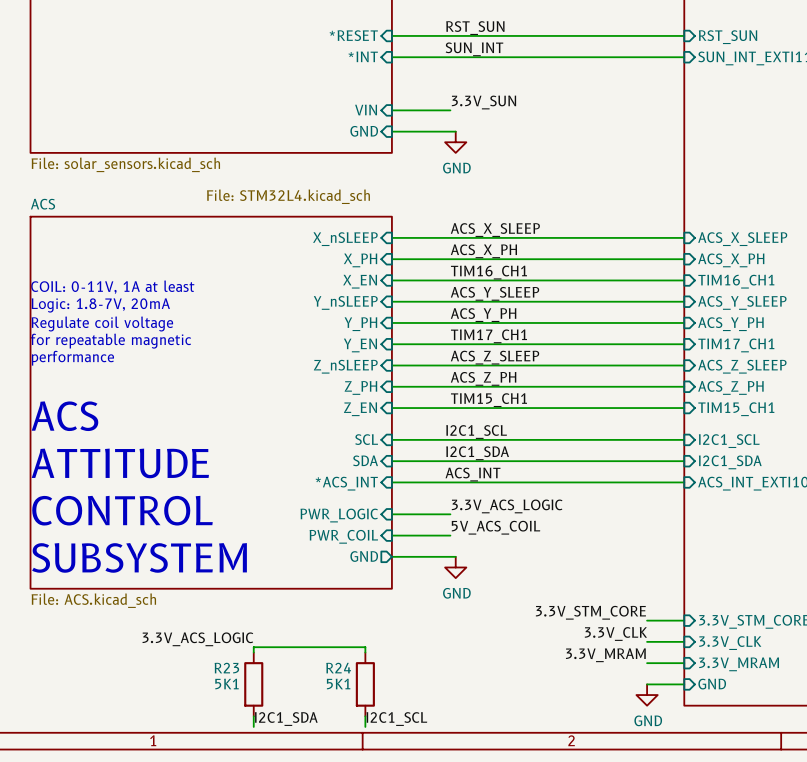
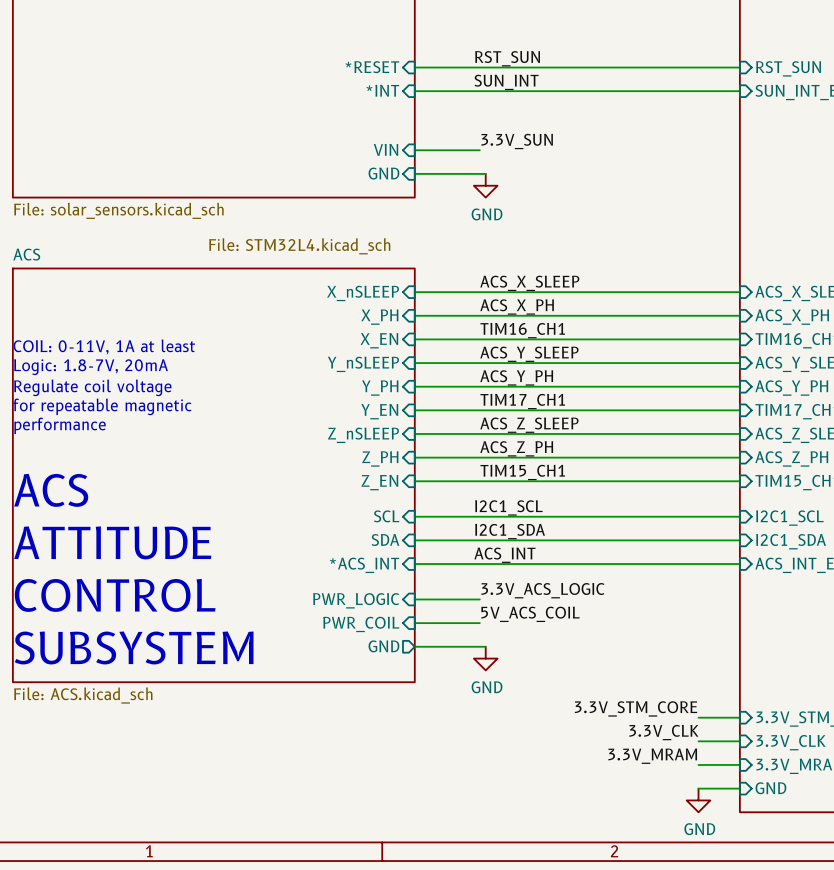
label: 3.3V_ACS_LOGIC (197, 639) -> none
wire: (253, 652) (253, 647) (365, 647) (365, 652) -> none
R23: 5K1 (253, 684) -> none
R24: 5K1 (365, 684) -> none
wire: (253, 716) (253, 726) -> none
wire: (365, 716) (365, 726) -> none
label: I2C1_SDA (286, 719) -> none
label: I2C1_SCL (396, 719) -> none

